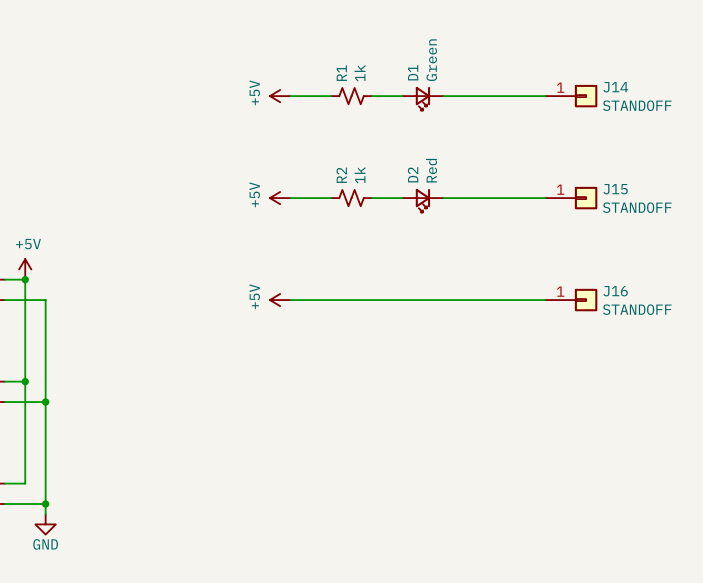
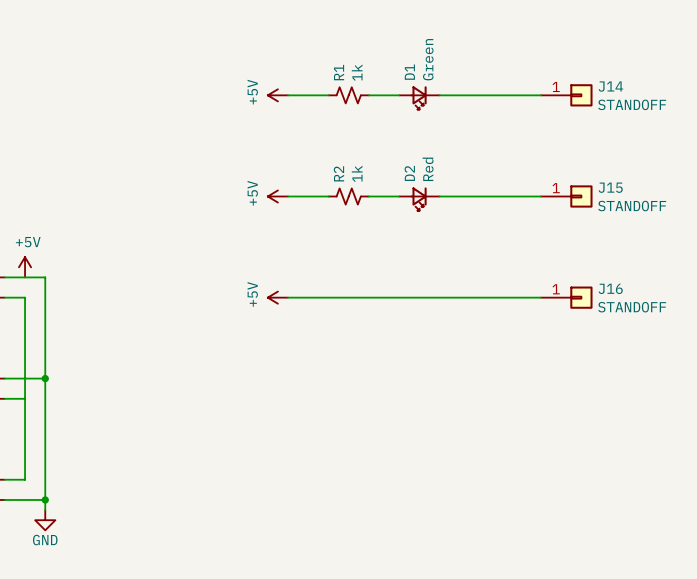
wire: (25, 279) (25, 300) (45, 300) -> (25, 277) (45, 277) (45, 297)
junction: (25, 279) -> none
junction: (25, 381) -> none
junction: none -> (45, 378)
wire: (25, 402) (45, 402) -> (25, 378) (45, 378)
junction: (45, 402) -> none

